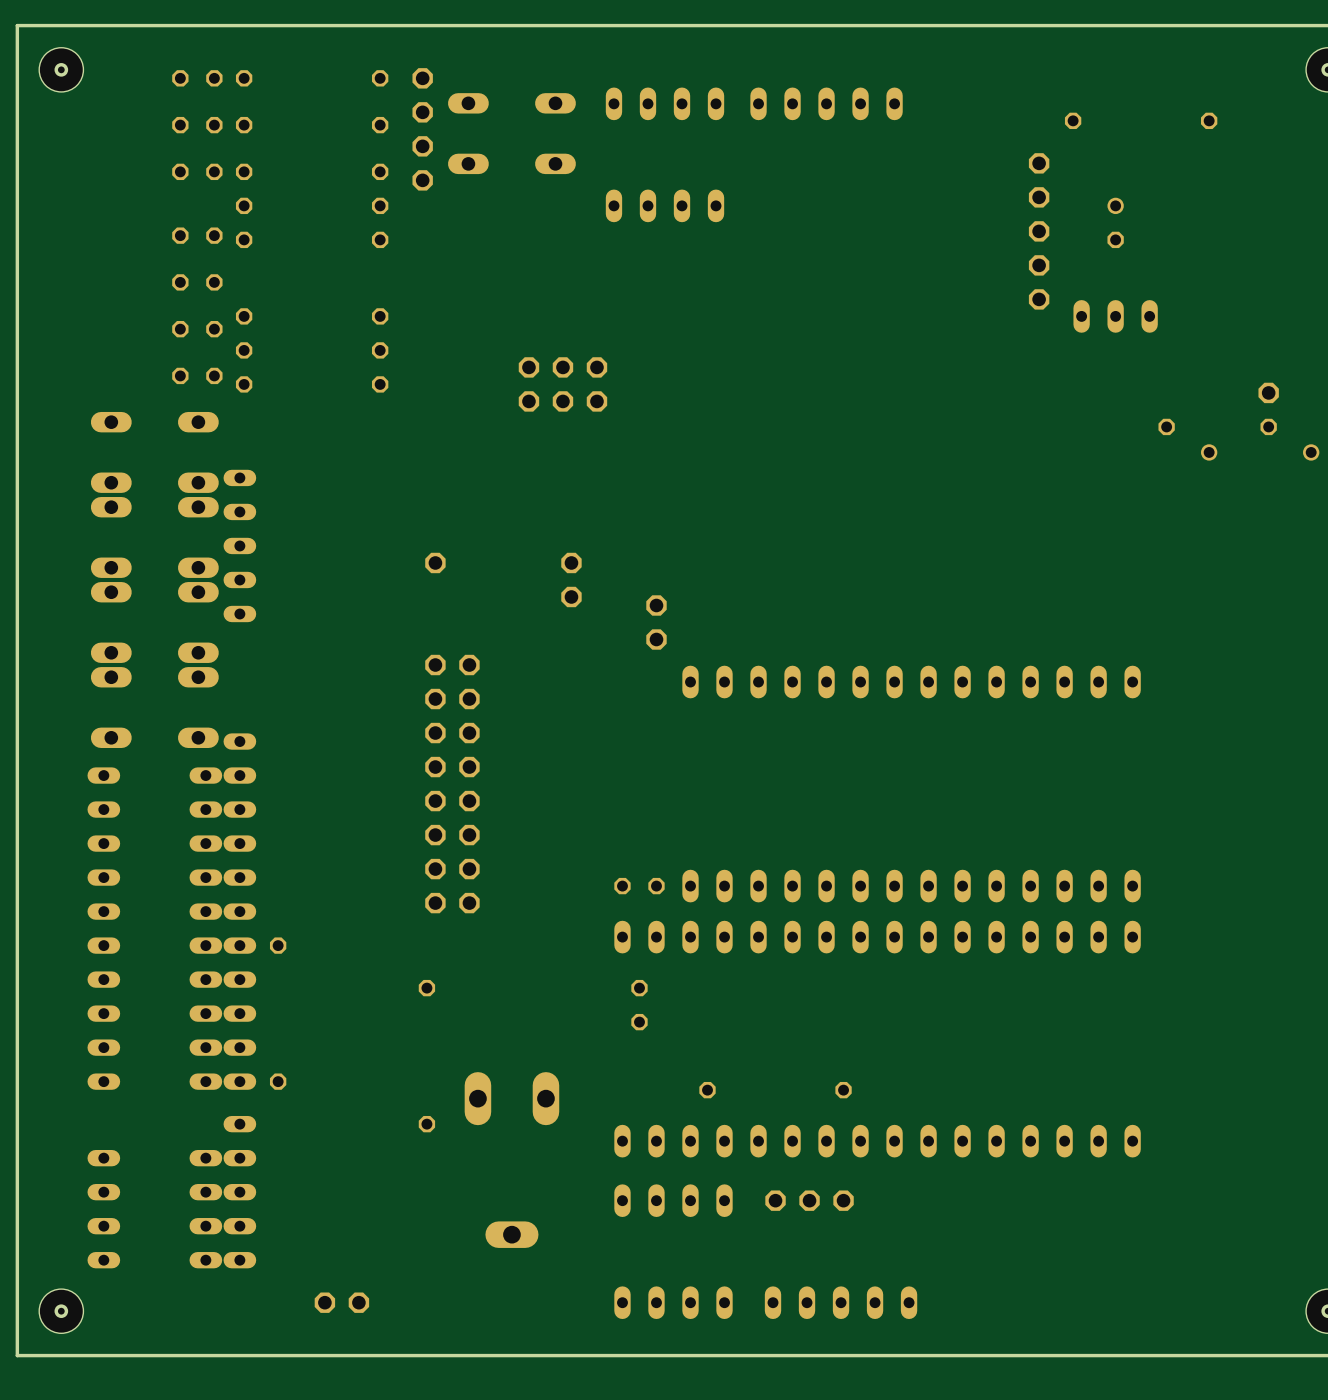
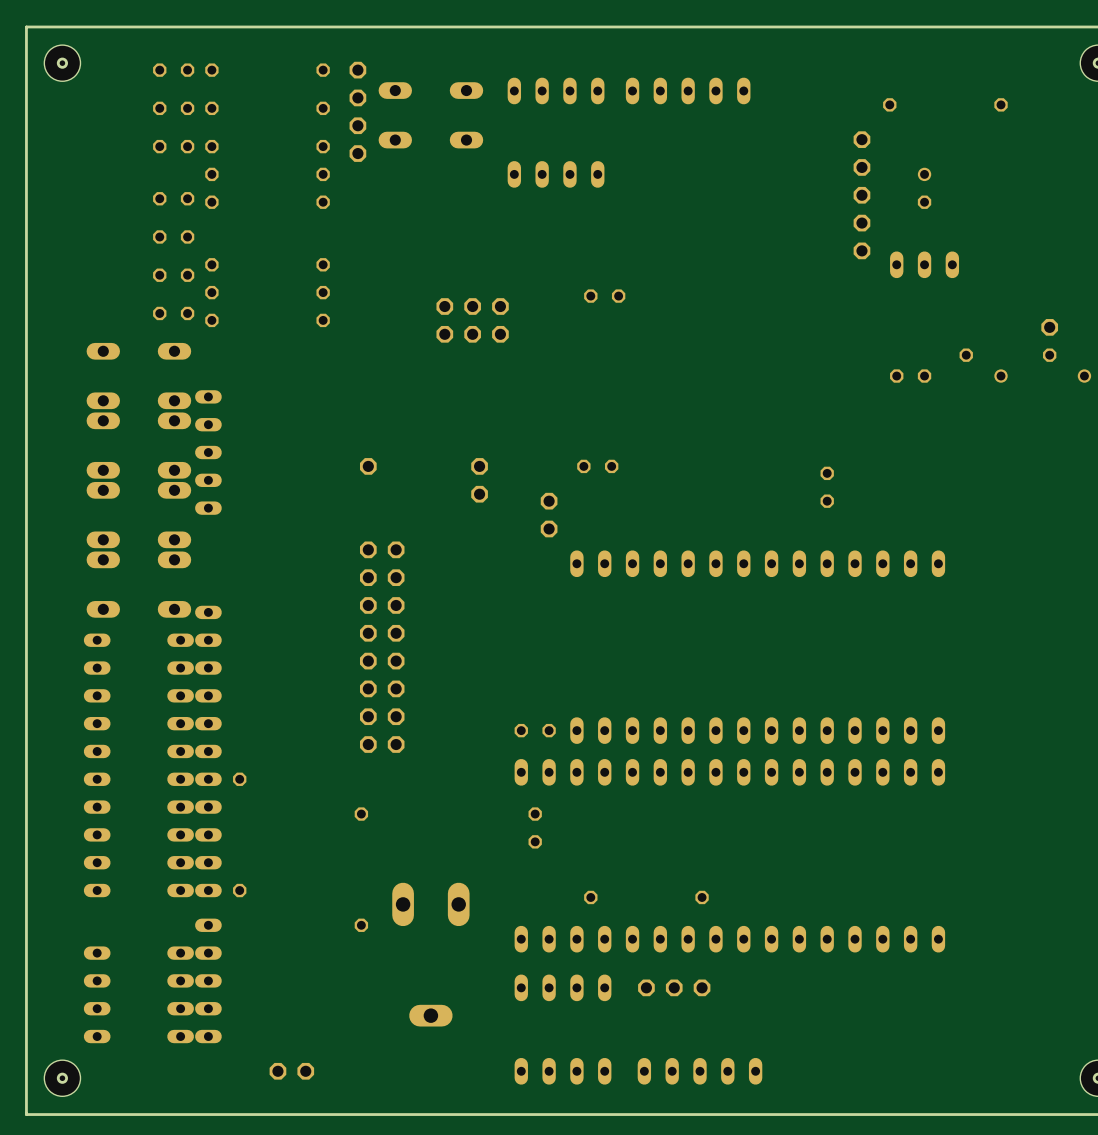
part: none -> (604, 296)
part: none -> (910, 376)
part: none -> (597, 466)
part: none -> (827, 487)

